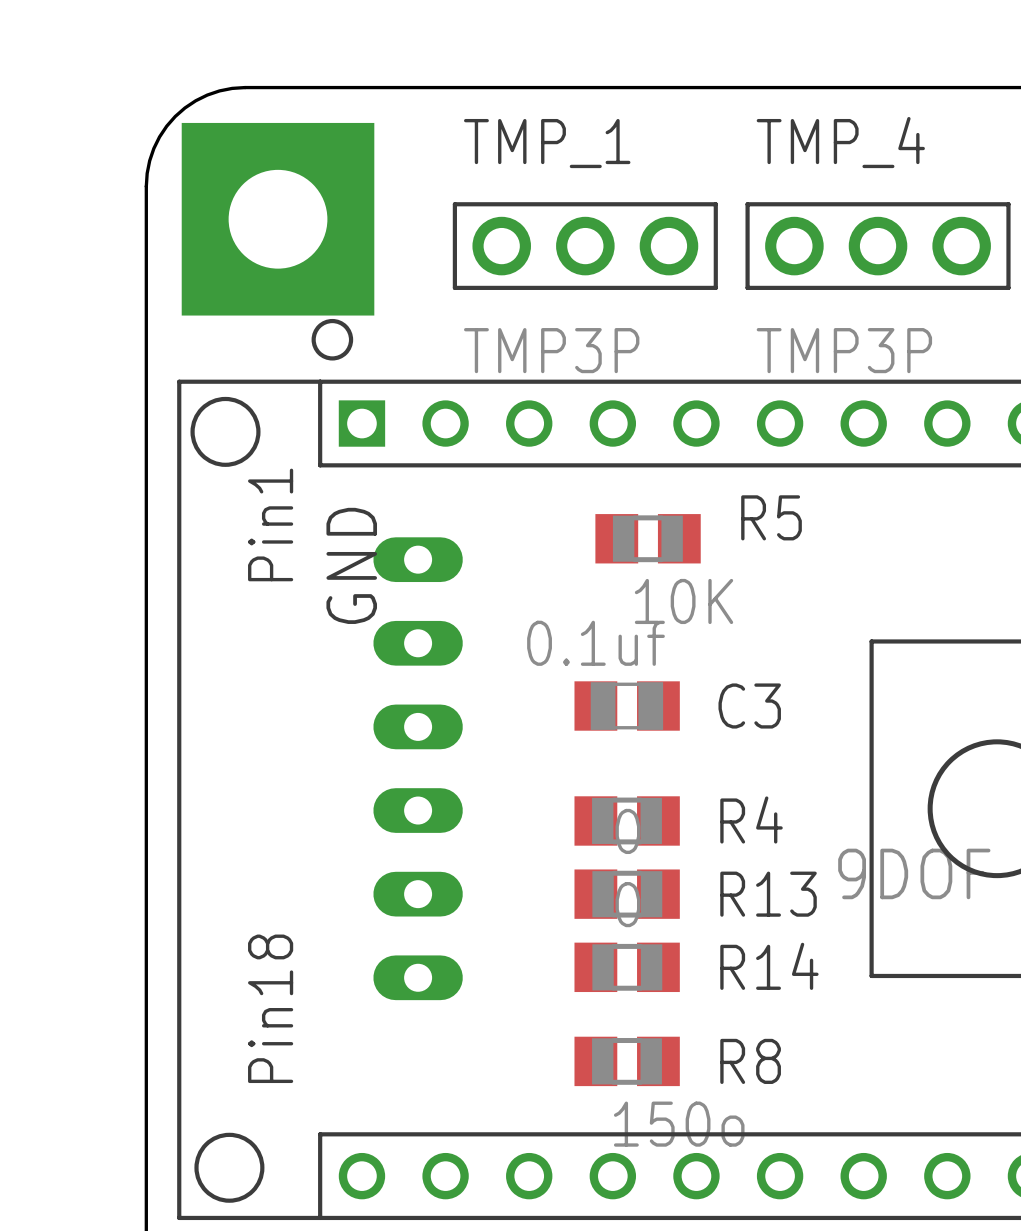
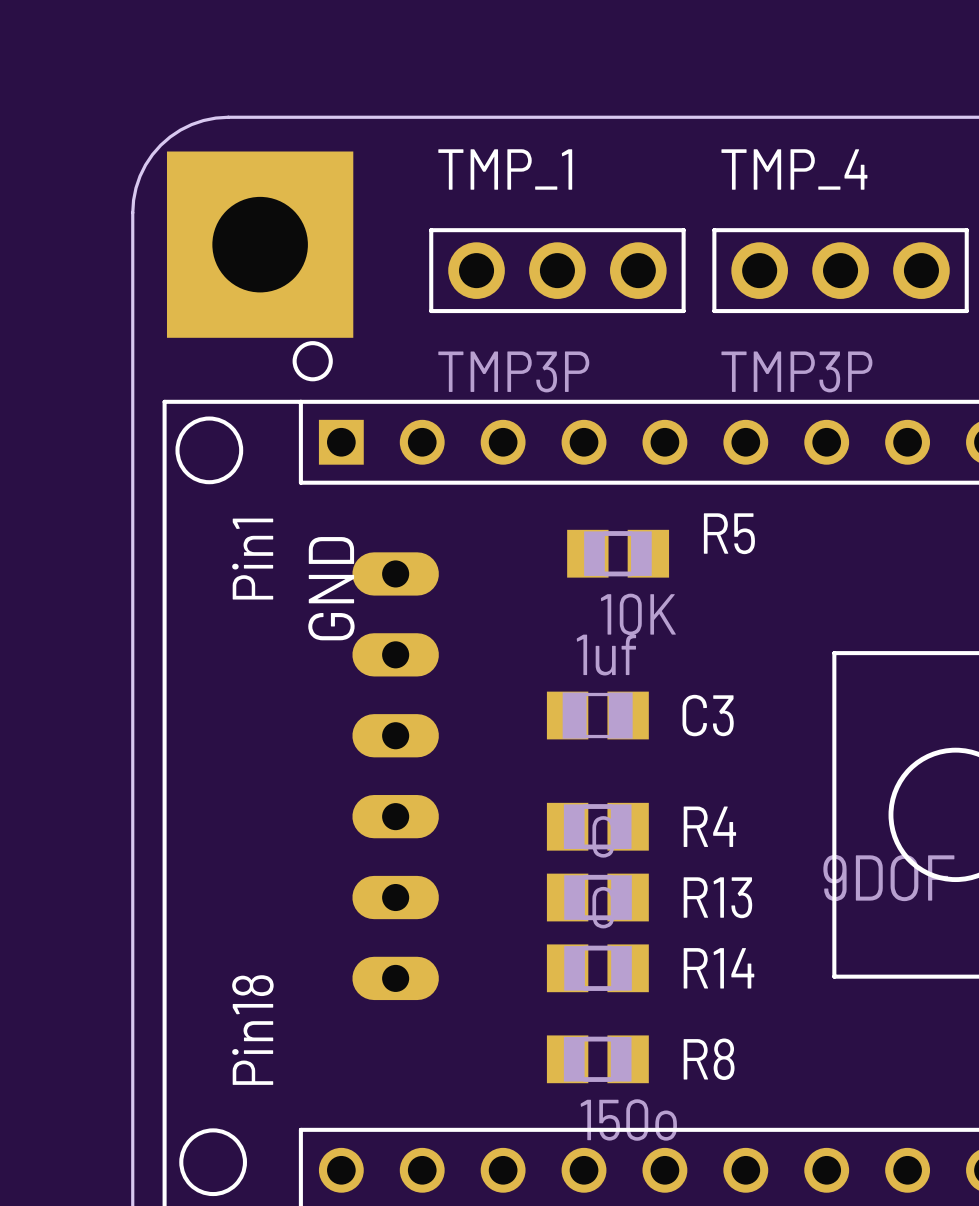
C3 value: 0.1uf (595, 643) -> 1uf (606, 655)

